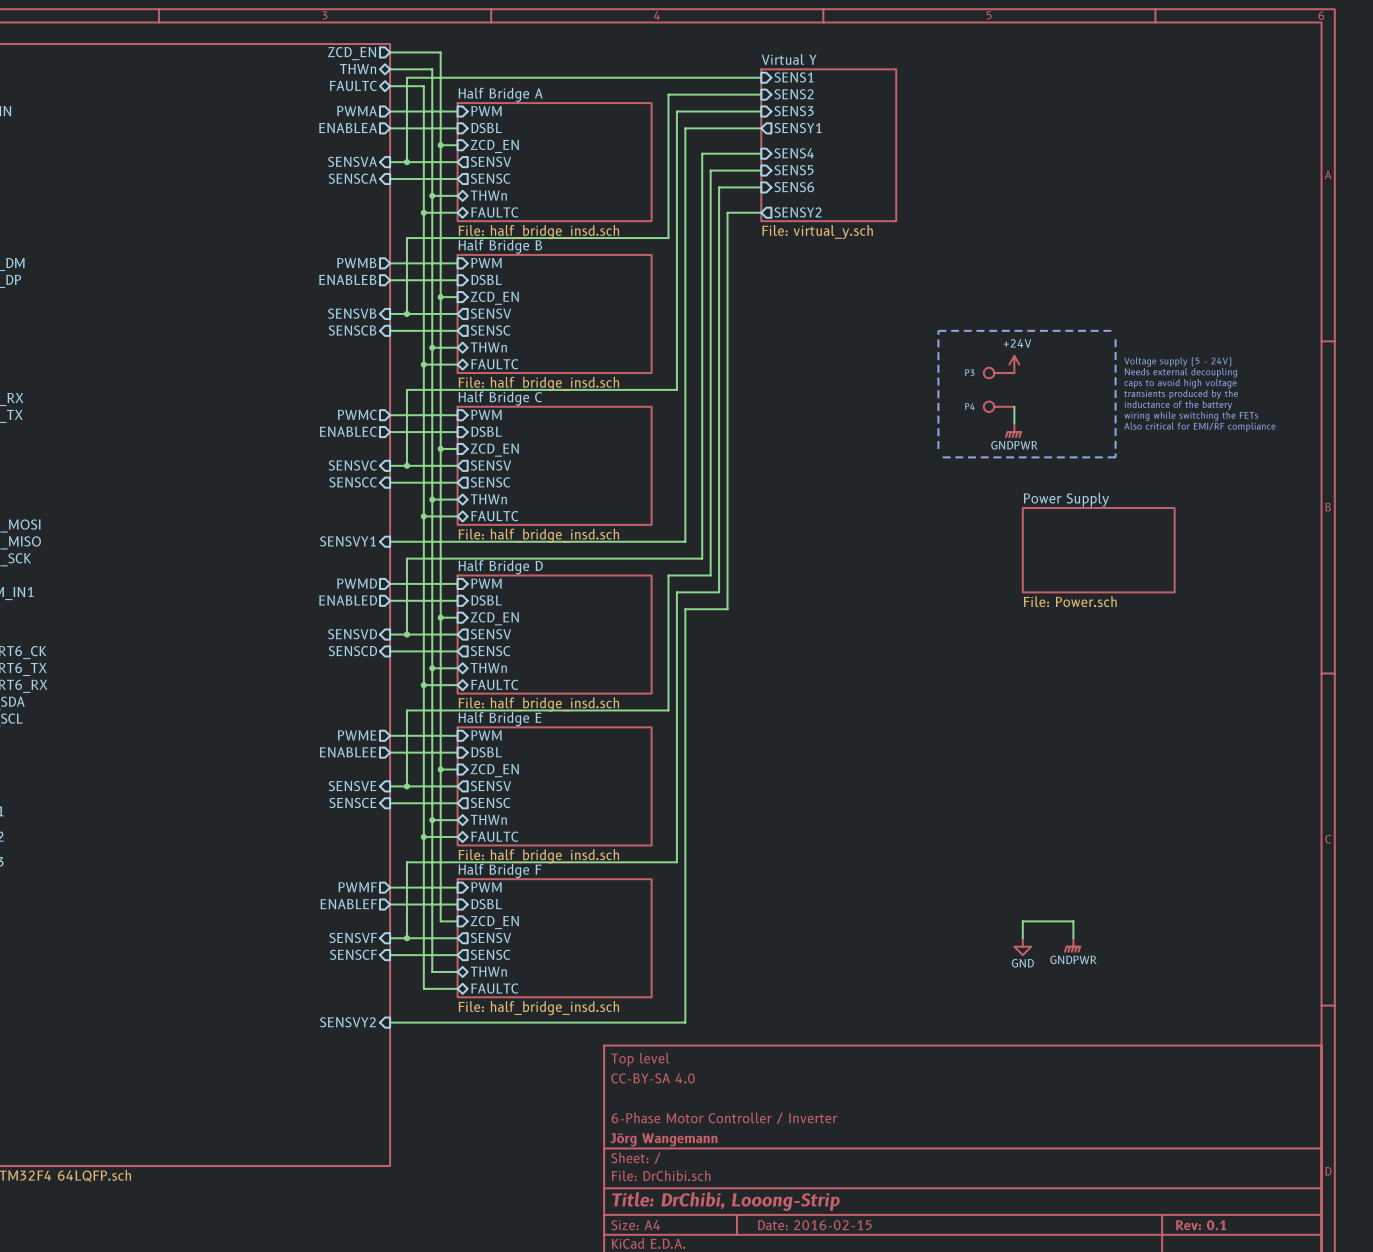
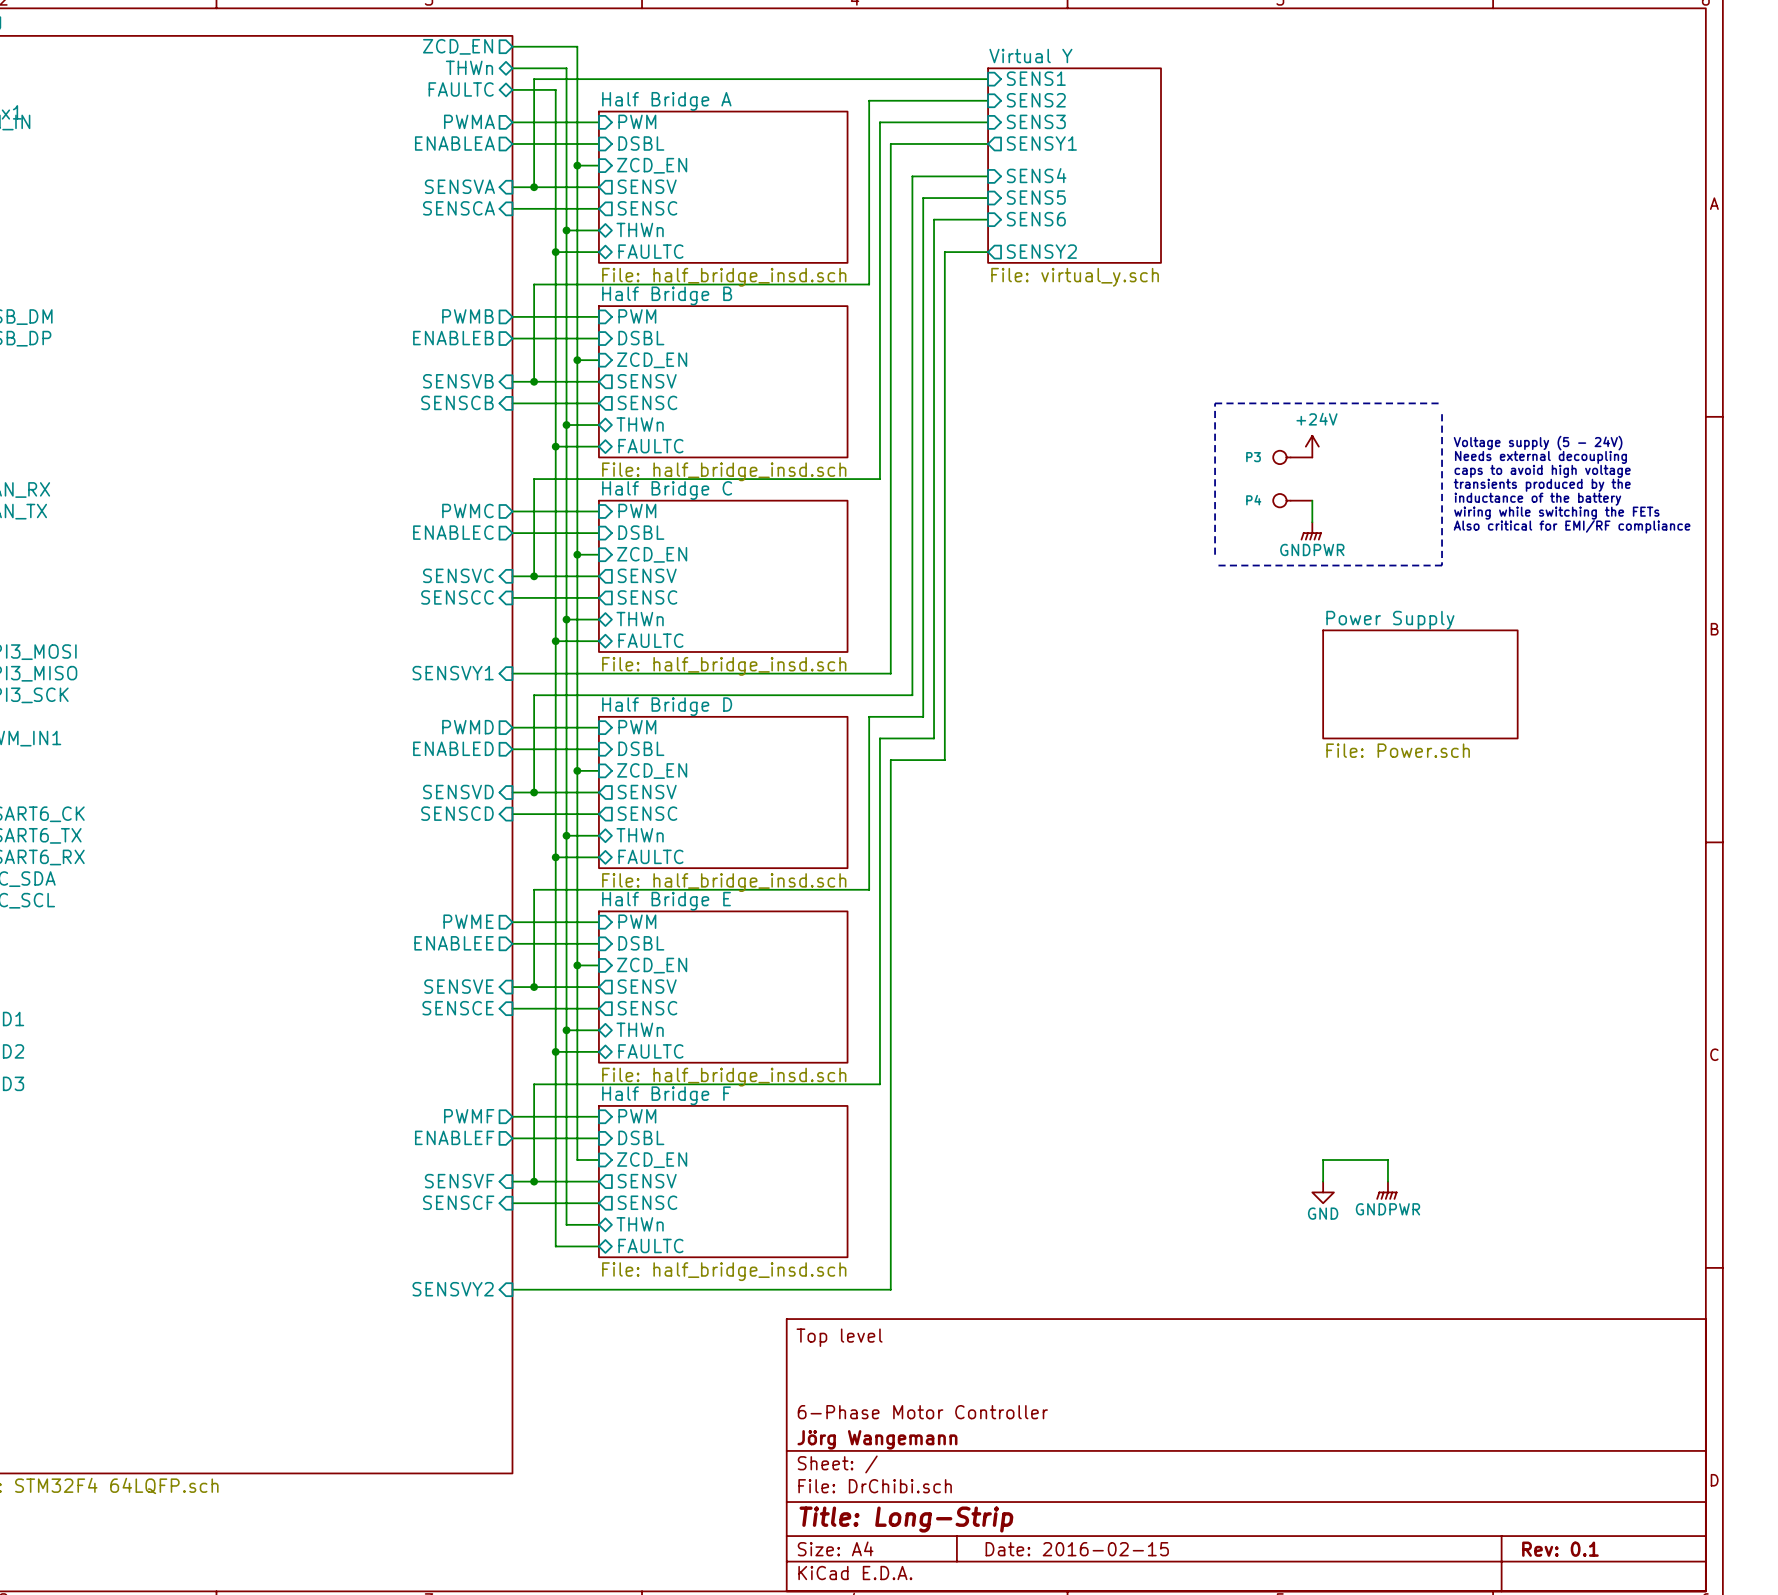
title block: CC-BY-SA 4.0 (653, 1078) -> none
title block: 6-Phase Motor Controller / Inverter (724, 1118) -> 6-Phase Motor Controller (922, 1412)
title block: Title: DrChibi, Looong-Strip (726, 1201) -> Title: Long-Strip (906, 1519)

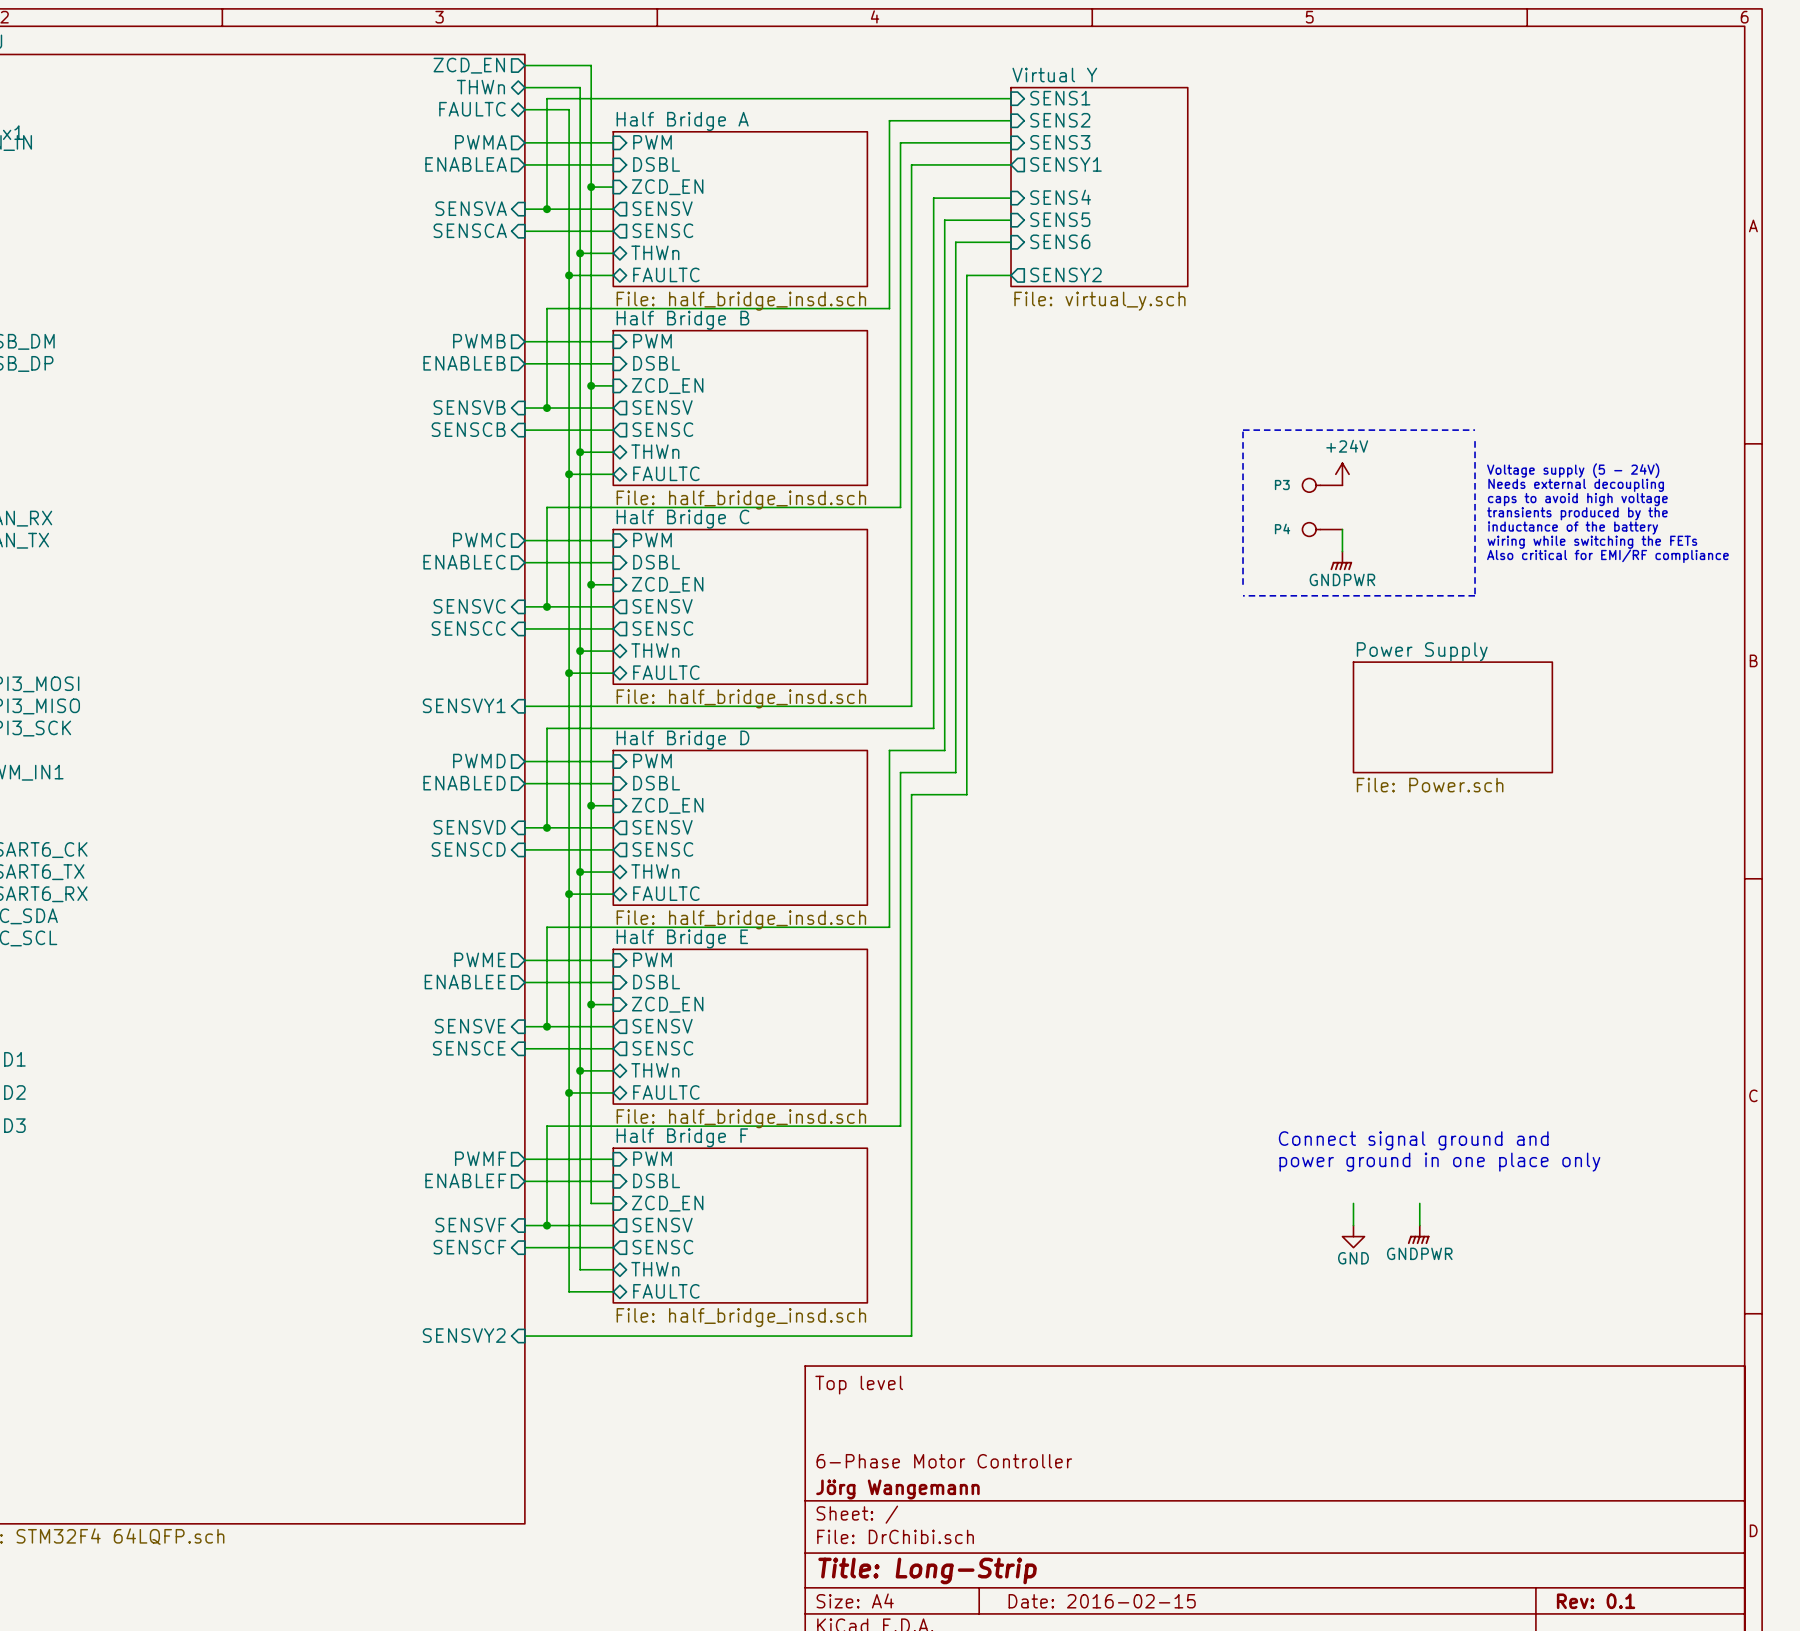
text: none -> Connect signal ground and (1413, 1140)
text: none -> power ground in one place only (1439, 1162)
wire: (1323, 1159) (1387, 1159) -> none

